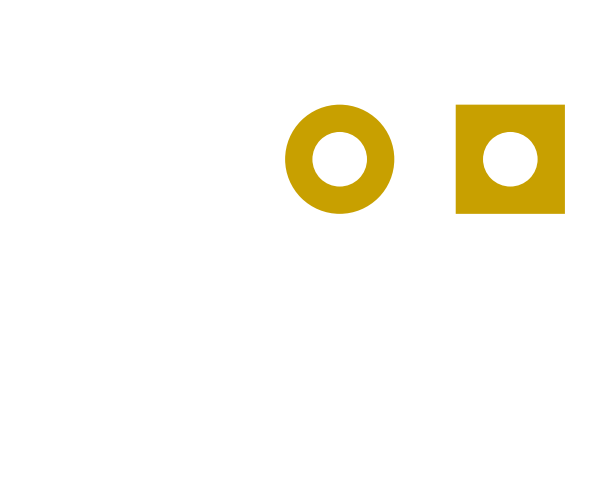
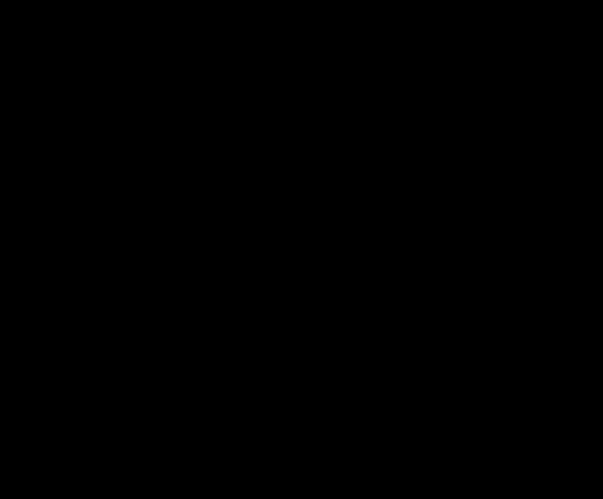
part: (425, 159) -> none

